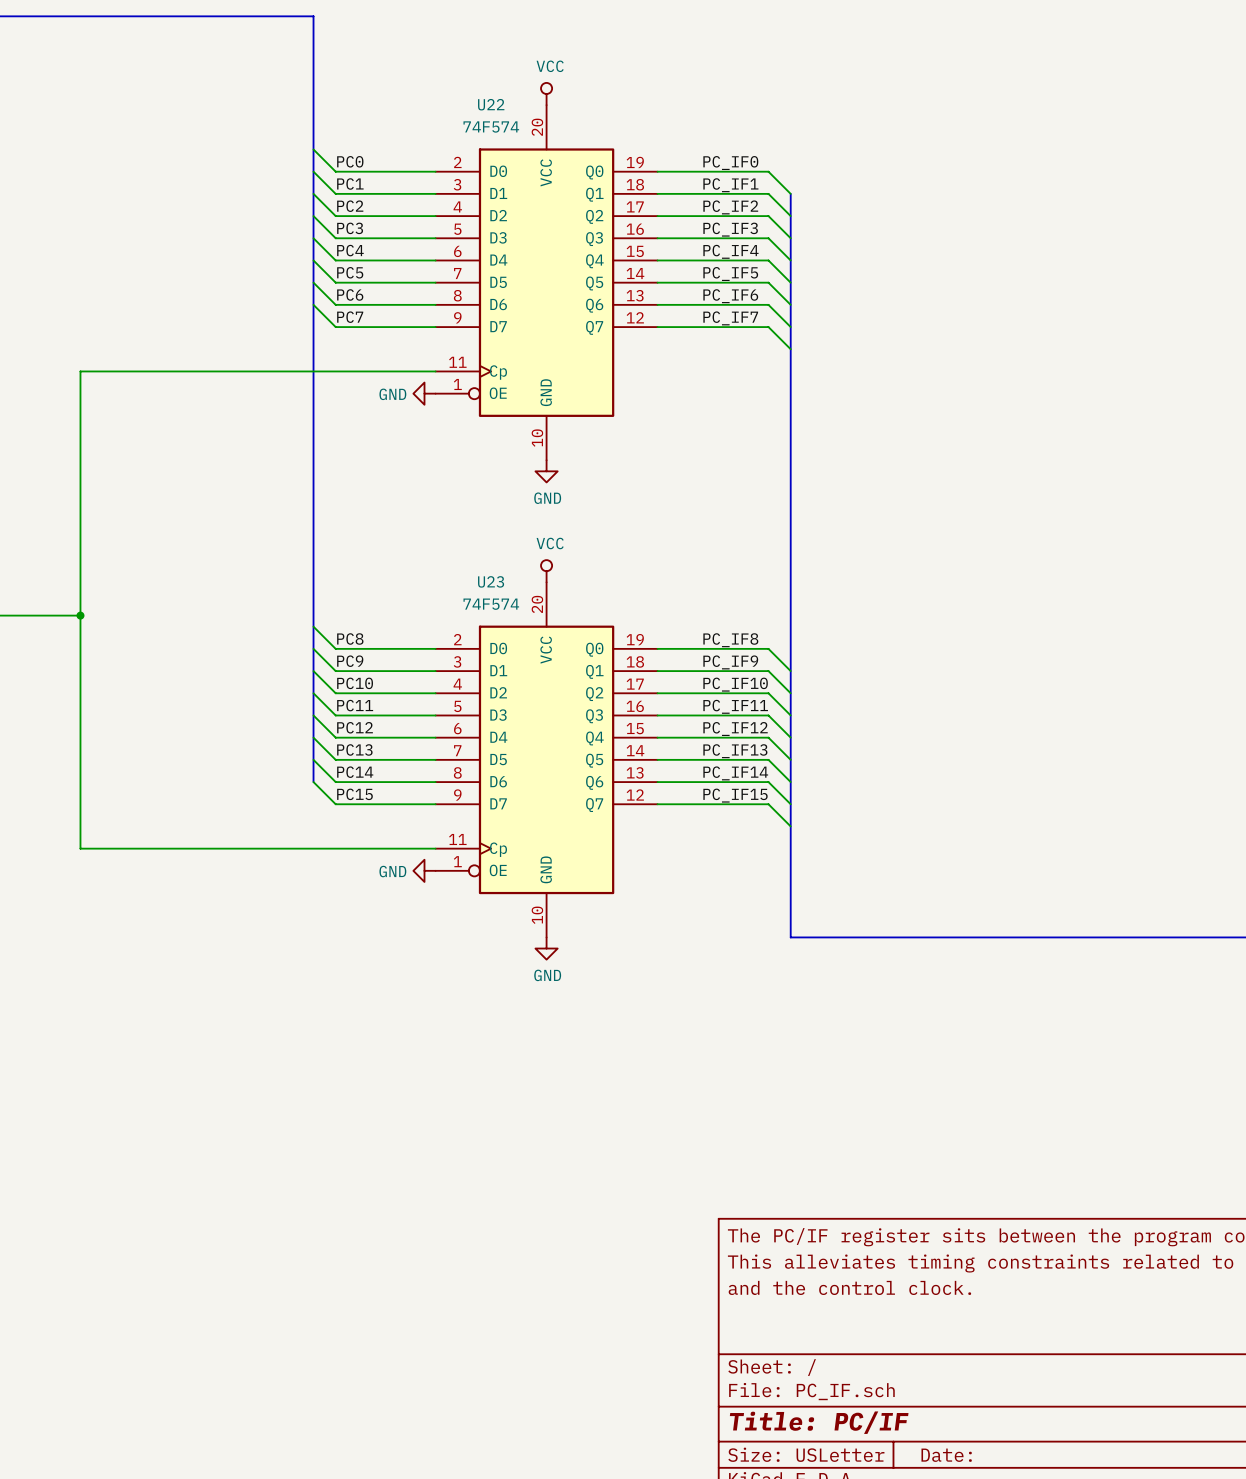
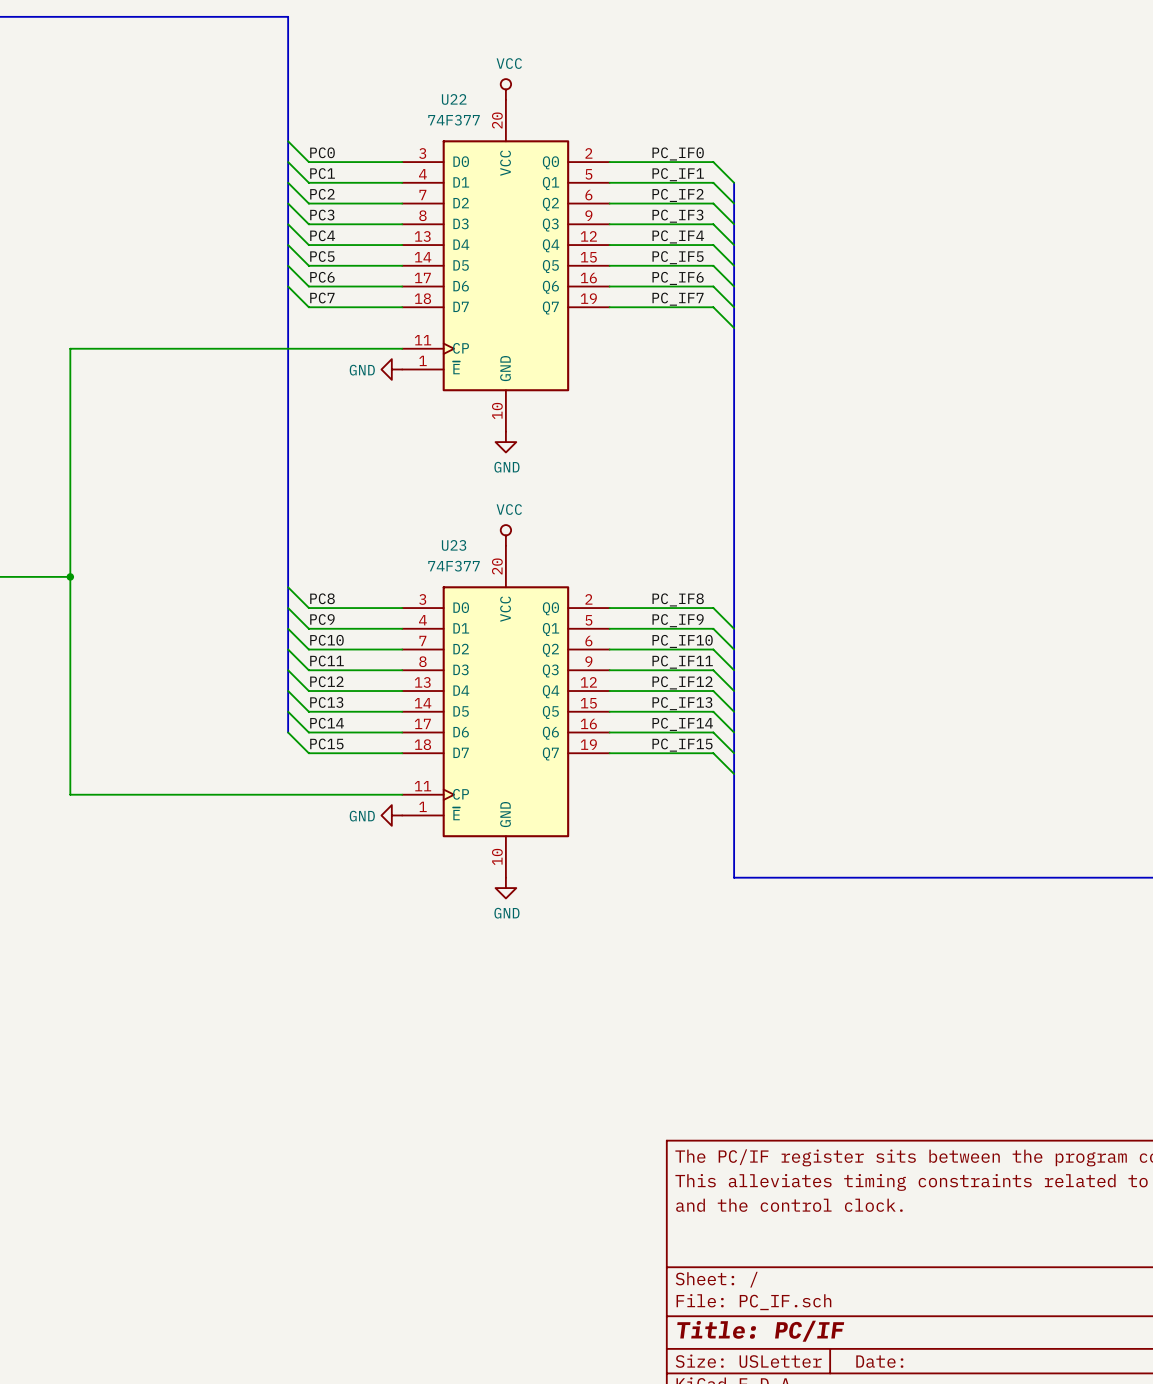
U22 symbol: [435, 105, 658, 461] -> [402, 99, 610, 432]
U22 value: 74F574 (491, 126) -> 74F377 (454, 120)
U23 symbol: [435, 582, 658, 938] -> [402, 545, 610, 878]
U23 value: 74F574 (491, 604) -> 74F377 (454, 566)

